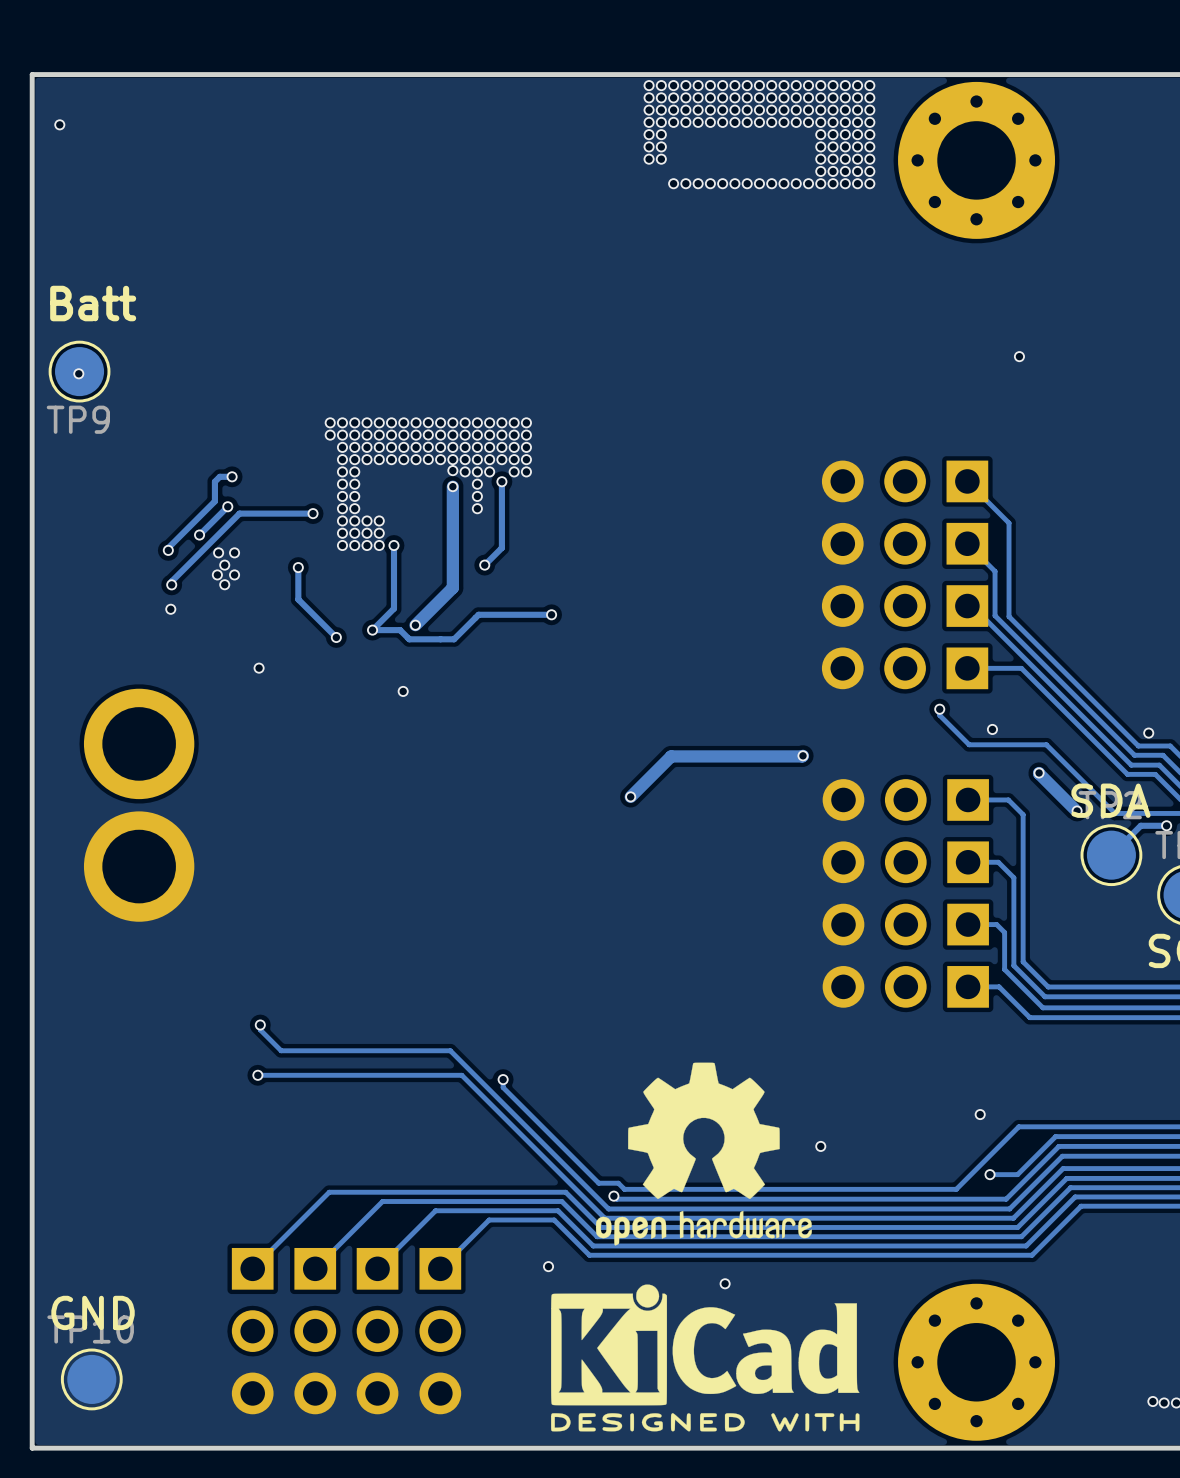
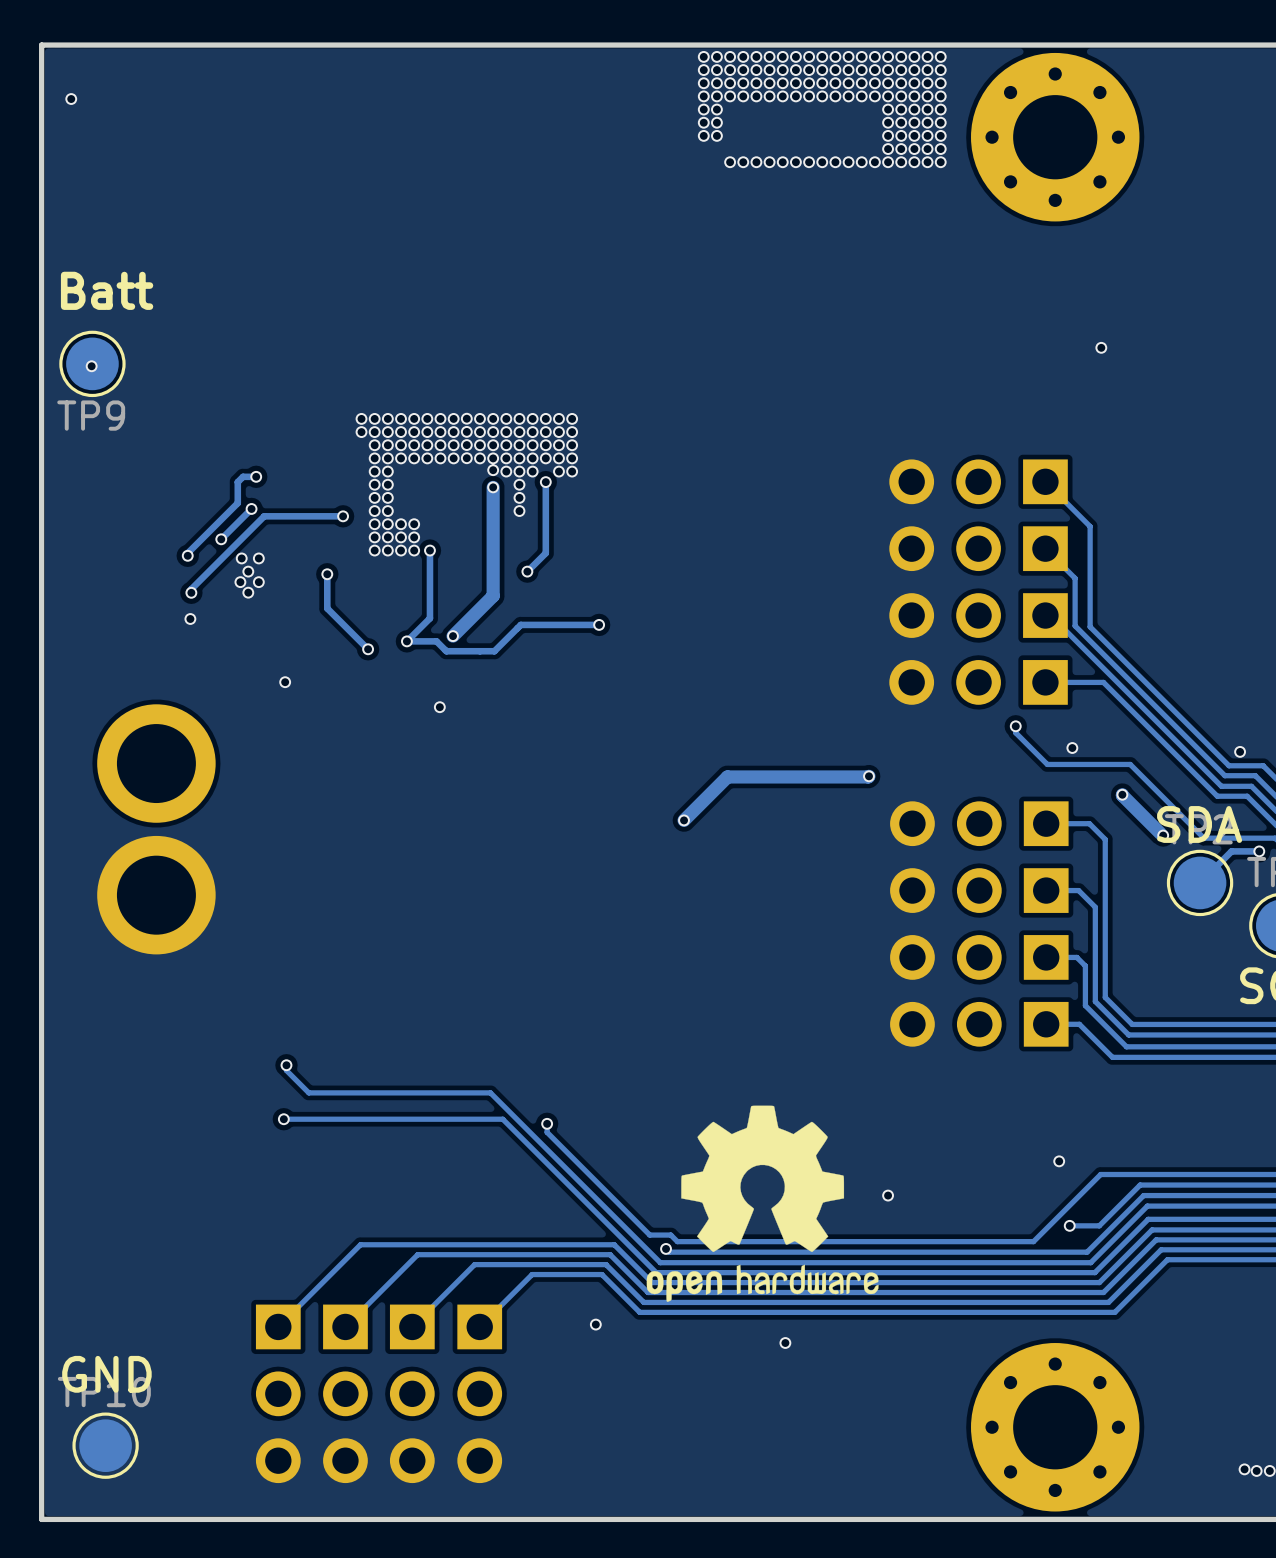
drawing: [551, 1284, 860, 1432] -> none

